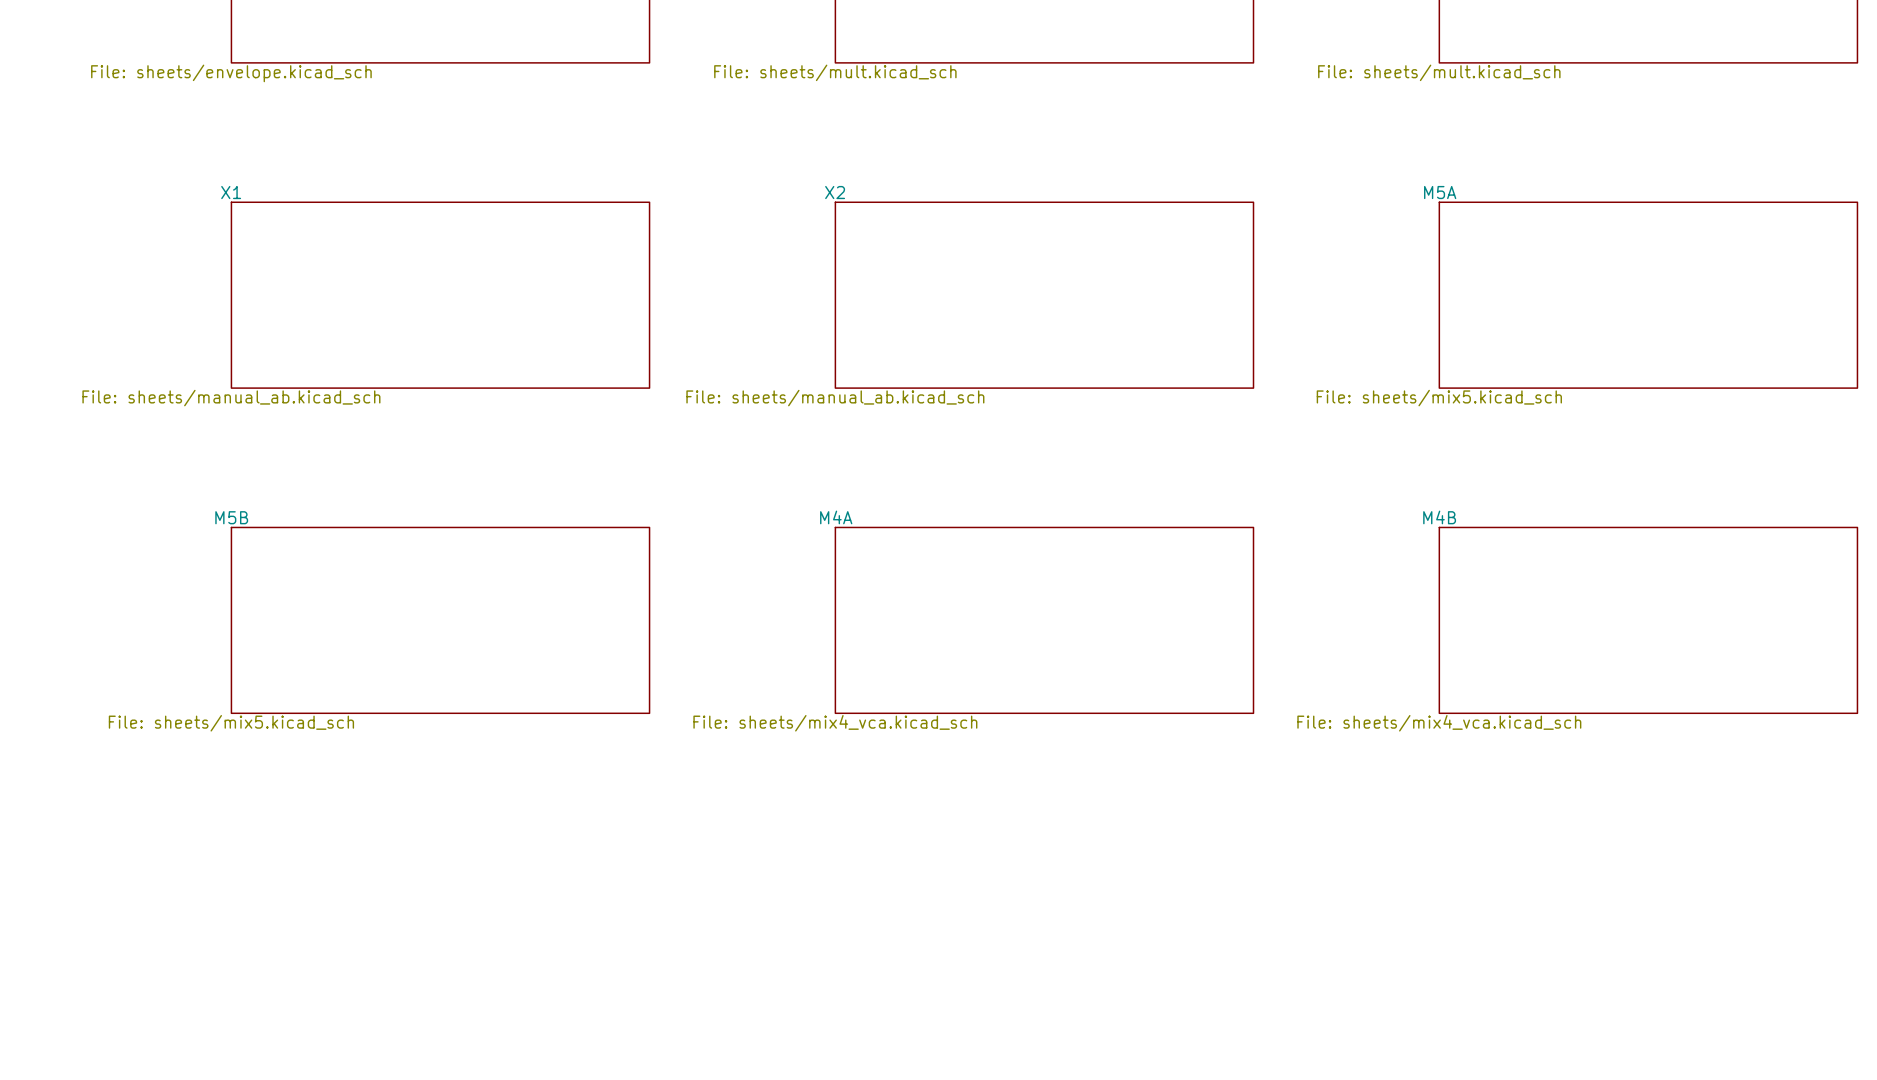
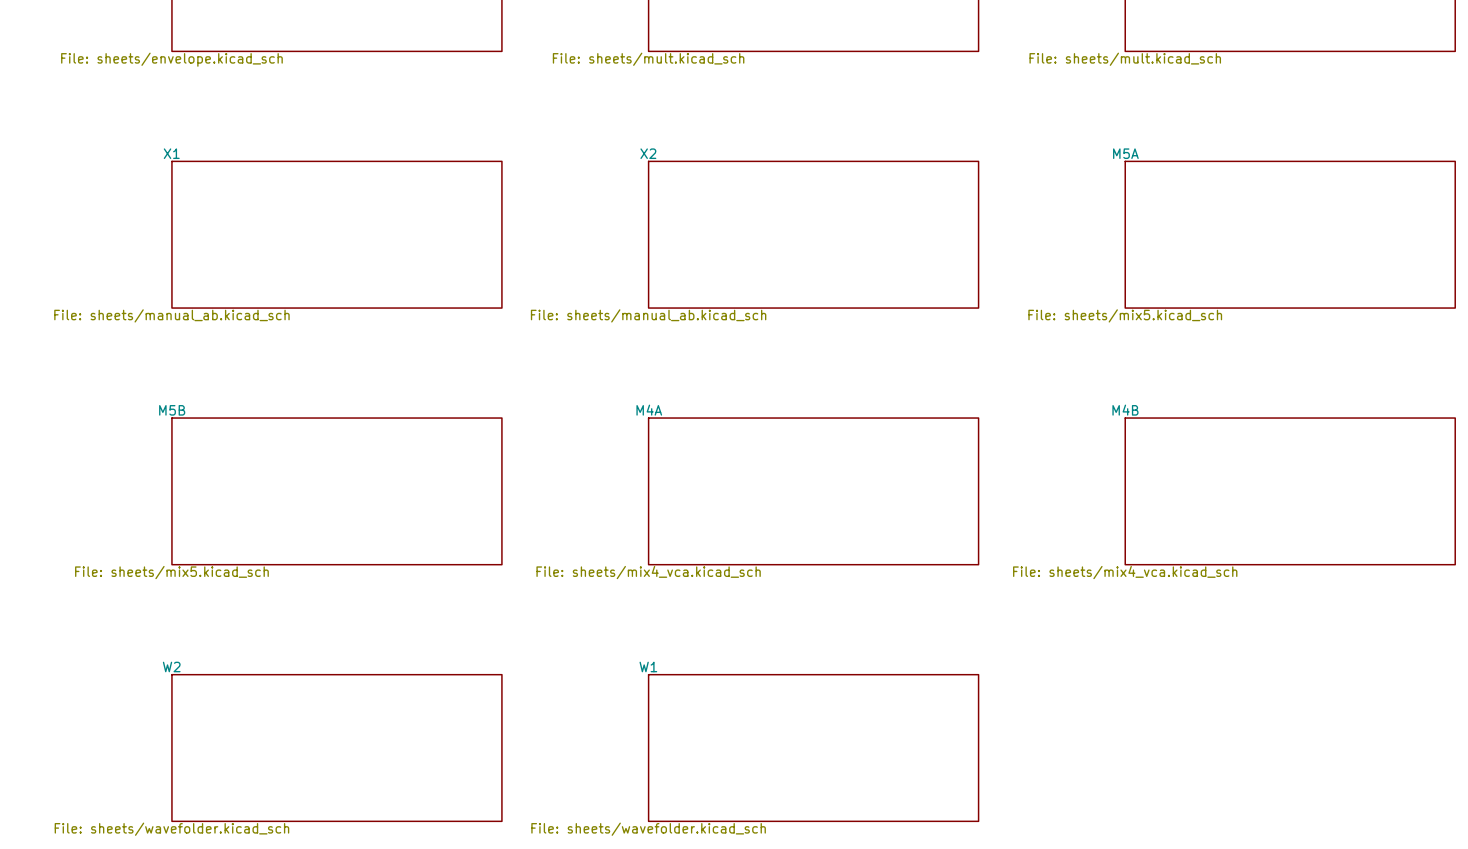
sheet W2: none -> File: sheets/wavefolder.kicad_sch (336, 748)
sheet W1: none -> File: sheets/wavefolder.kicad_sch (813, 748)

